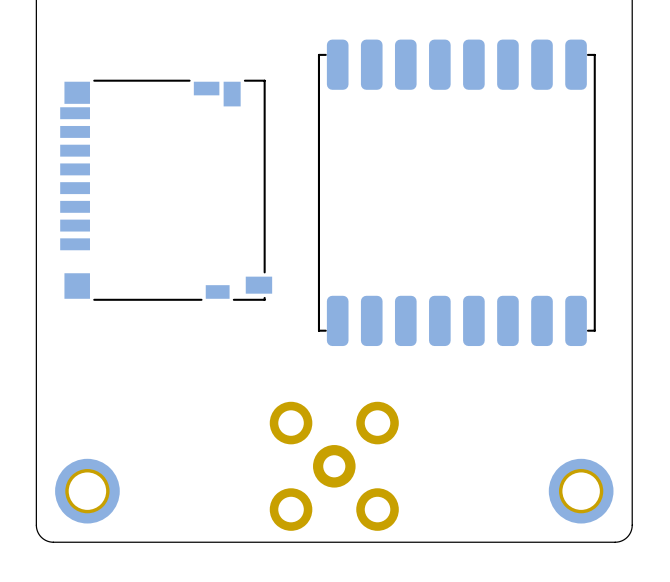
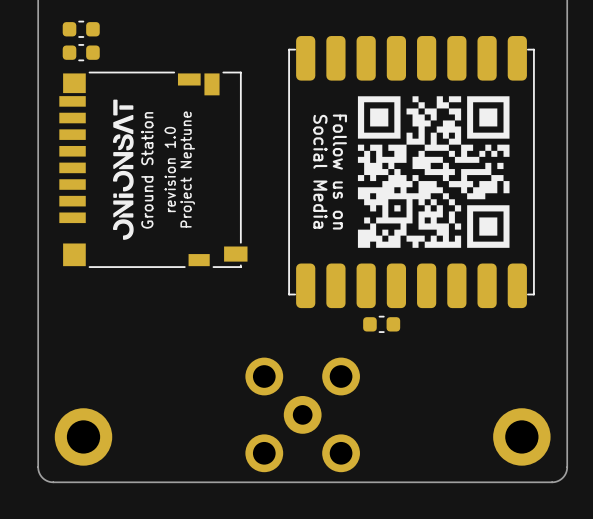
part: none -> (81, 29)
part: none -> (81, 52)
drawing: none -> [357, 96, 510, 248]
drawing: none -> [112, 99, 134, 240]
text: none -> Project Neptune (187, 169)
text: none -> revision 1.0 (170, 169)
text: none -> Social Media (320, 171)
text: none -> Follow us on (339, 172)
text: none -> Ground Station (147, 170)
part: none -> (381, 324)

